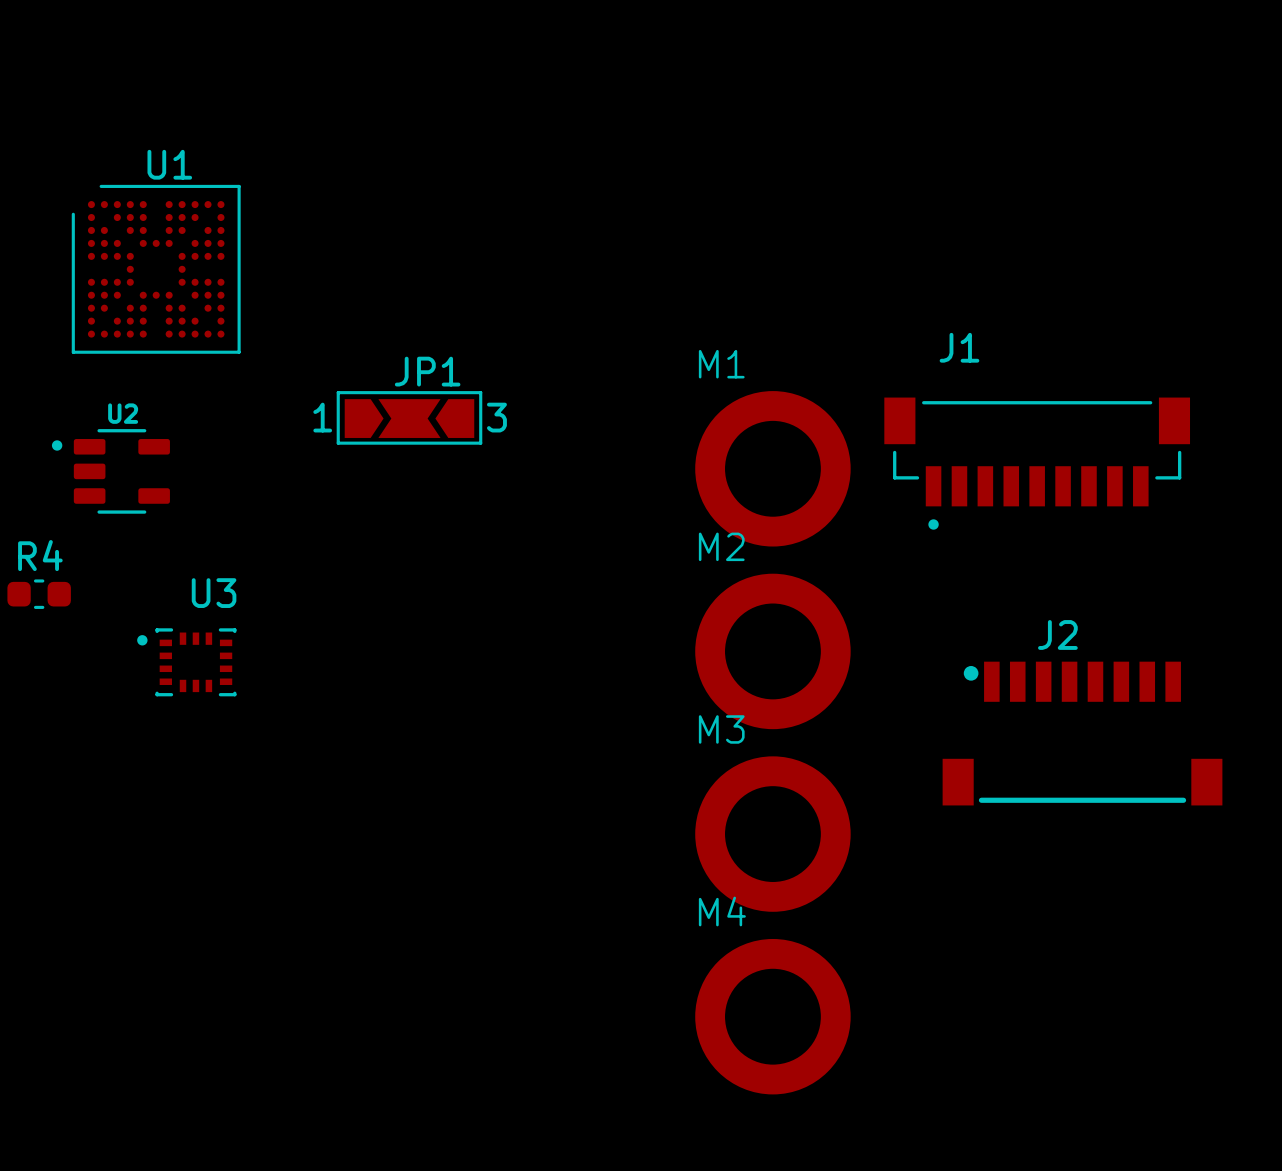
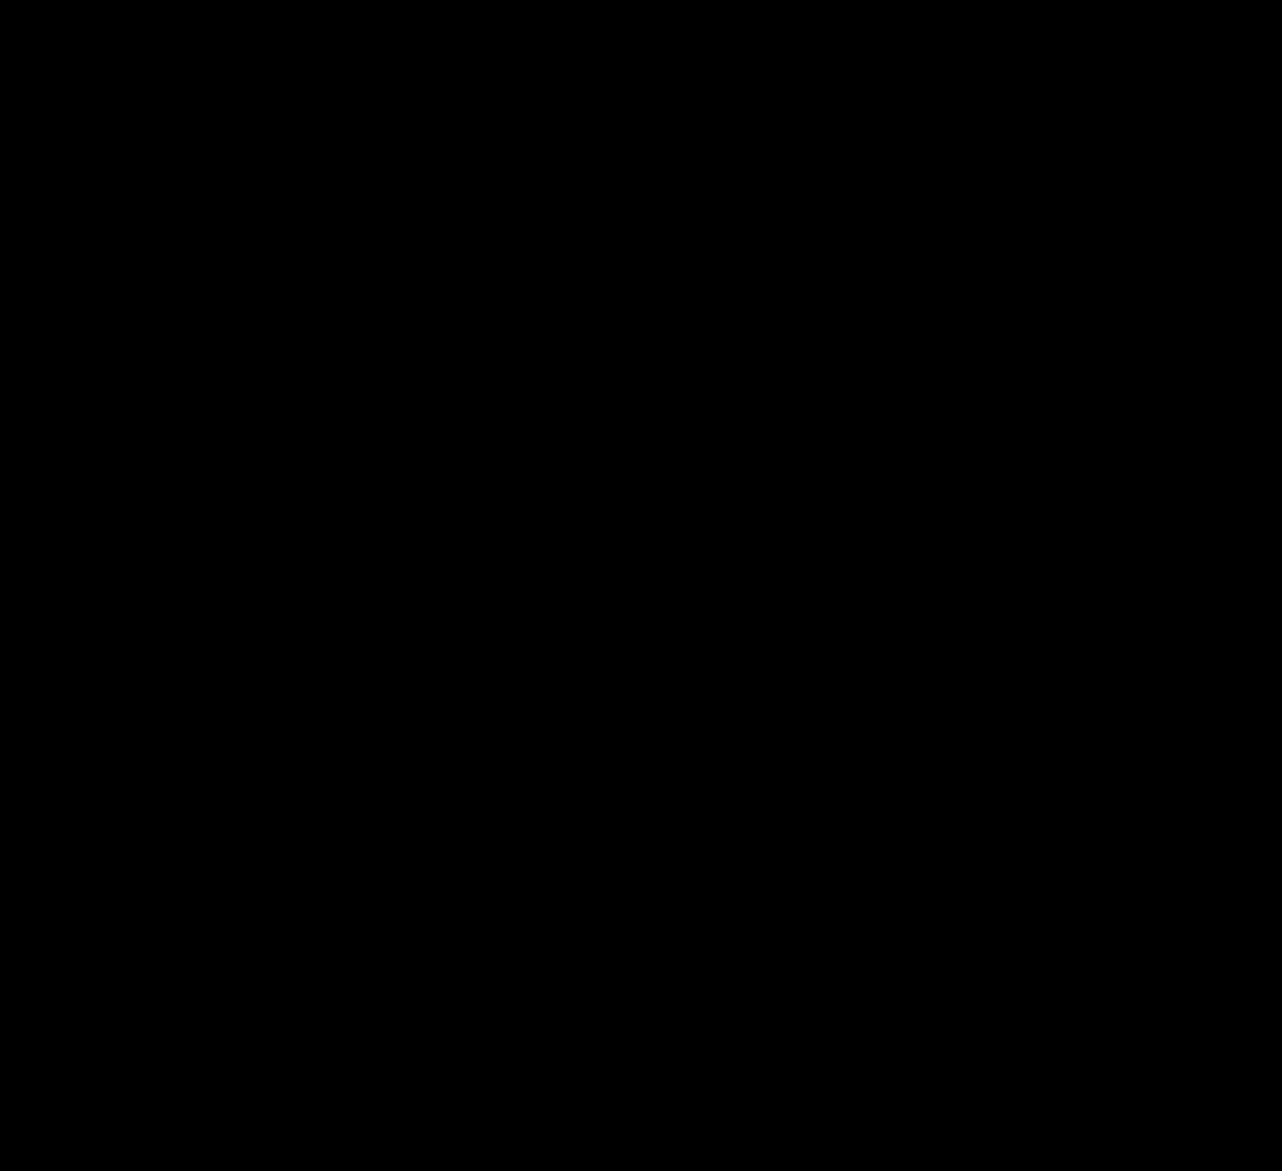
U1: (156, 269) -> none
JP1: (409, 417) -> none
J1: (1037, 463) -> none
M1: (772, 468) -> none
U2: (110, 471) -> none
R4: (39, 594) -> none
M2: (772, 651) -> none
U3: (186, 662) -> none
J2: (1082, 733) -> none
M3: (772, 834) -> none
M4: (772, 1016) -> none

